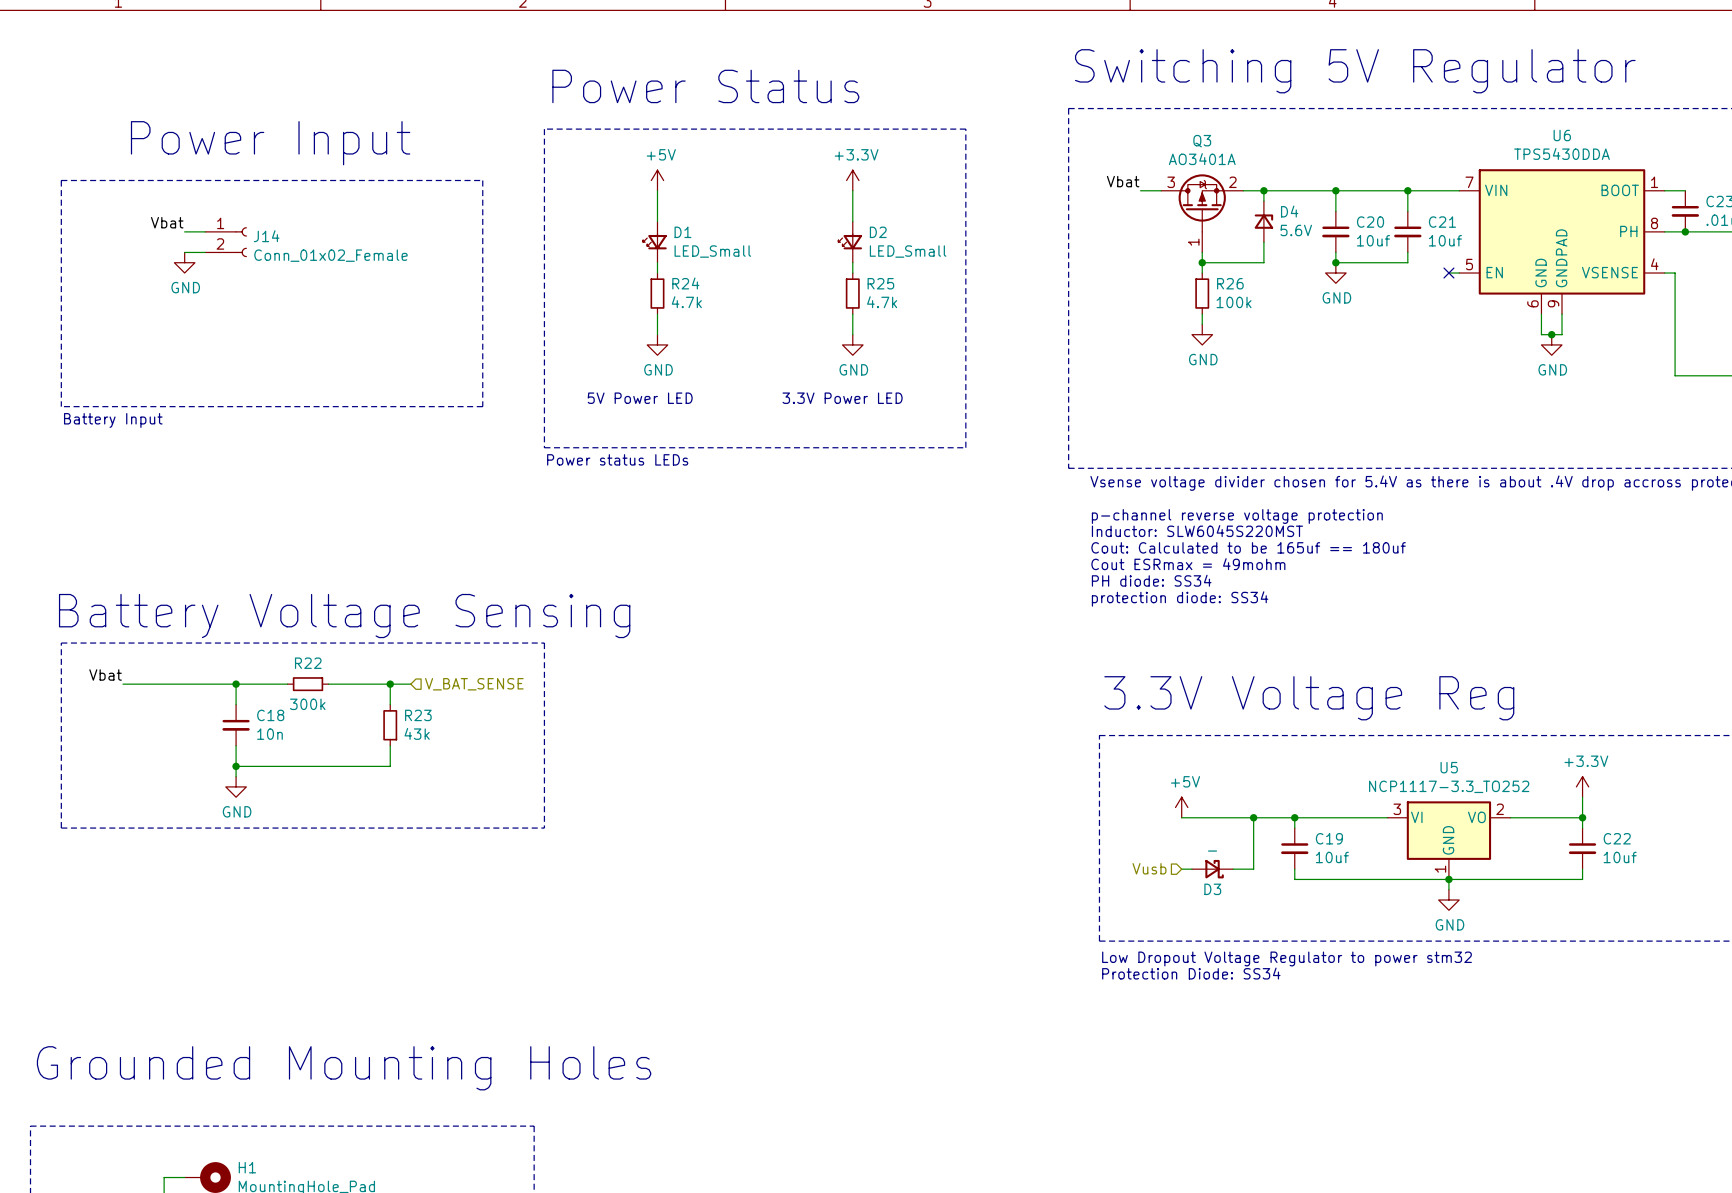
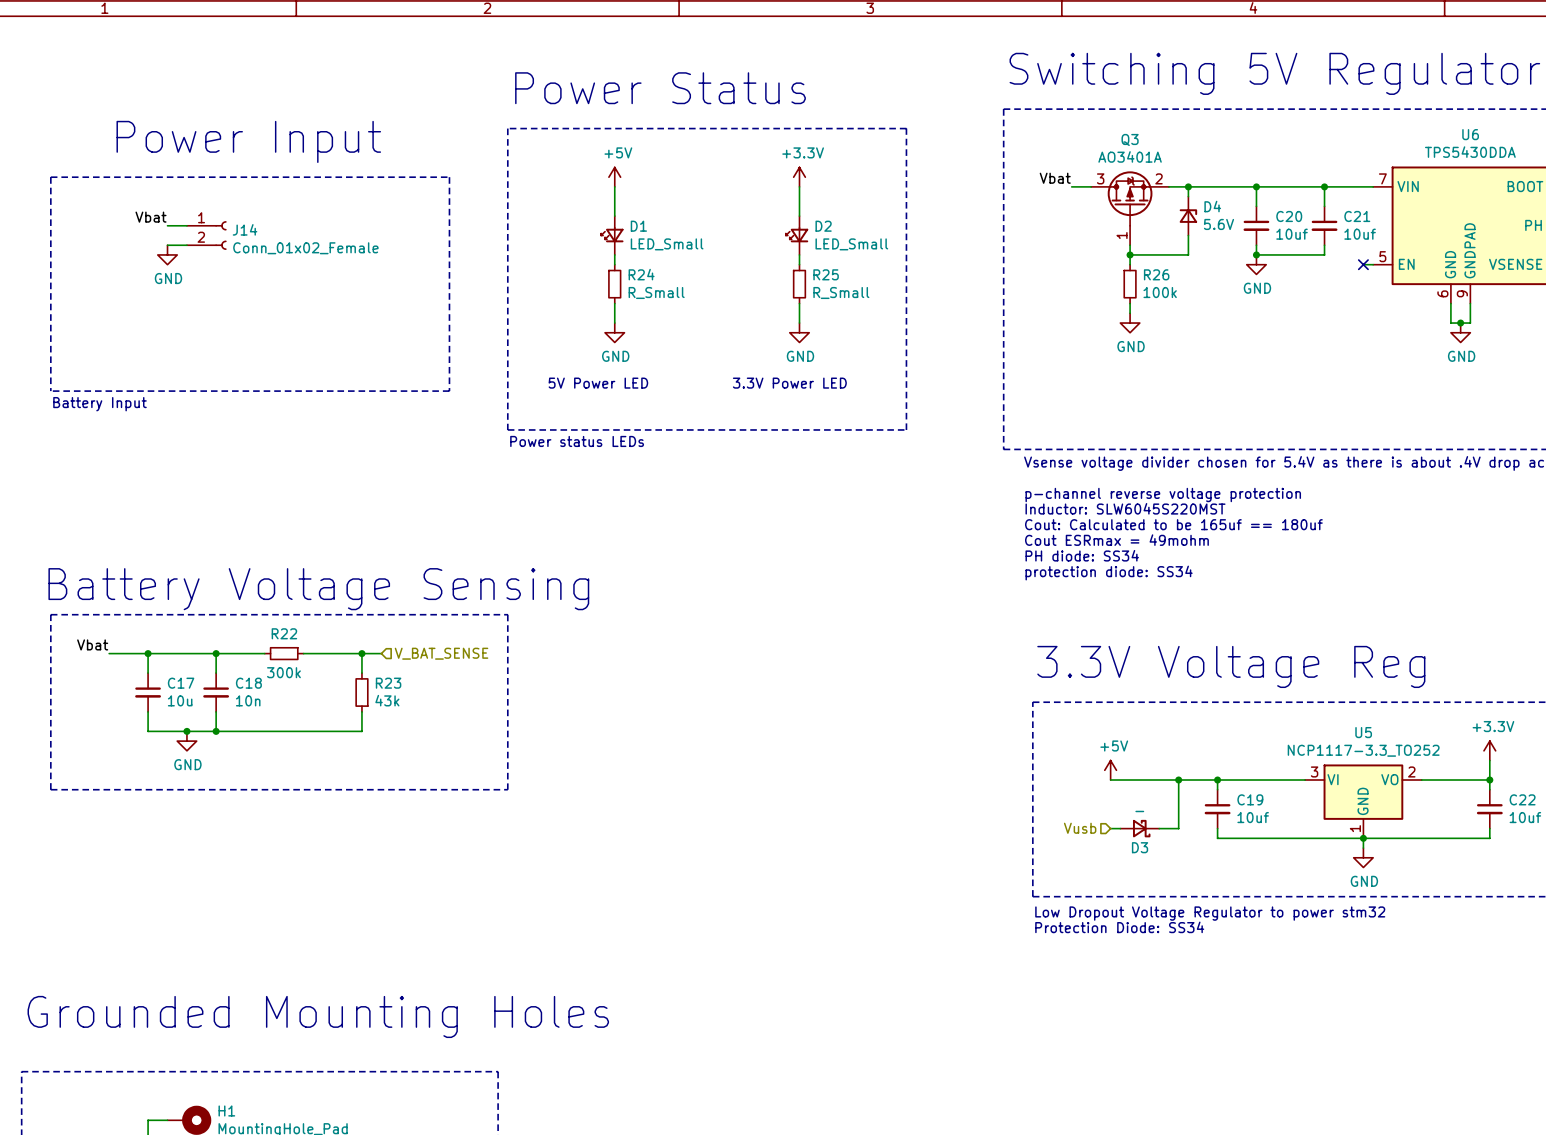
R24 value: 4.7k (686, 302) -> R_Small (656, 292)
R25 value: 4.7k (882, 302) -> R_Small (841, 292)
wire: none -> (148, 653) (148, 673)
junction: none -> (148, 653)
C17: none -> 10u (148, 692)
junction: none -> (186, 731)
wire: (236, 766) (236, 776) -> (216, 731) (148, 731) (148, 711)
power symbol position: GND (236, 786) -> GND (186, 741)

